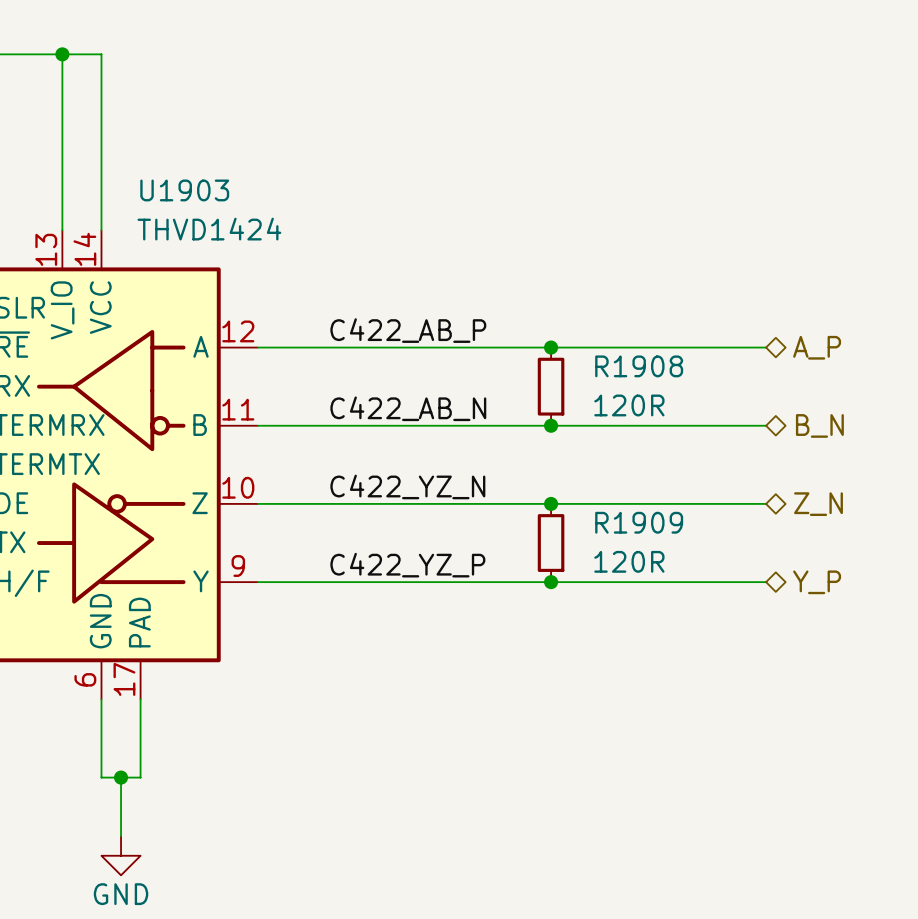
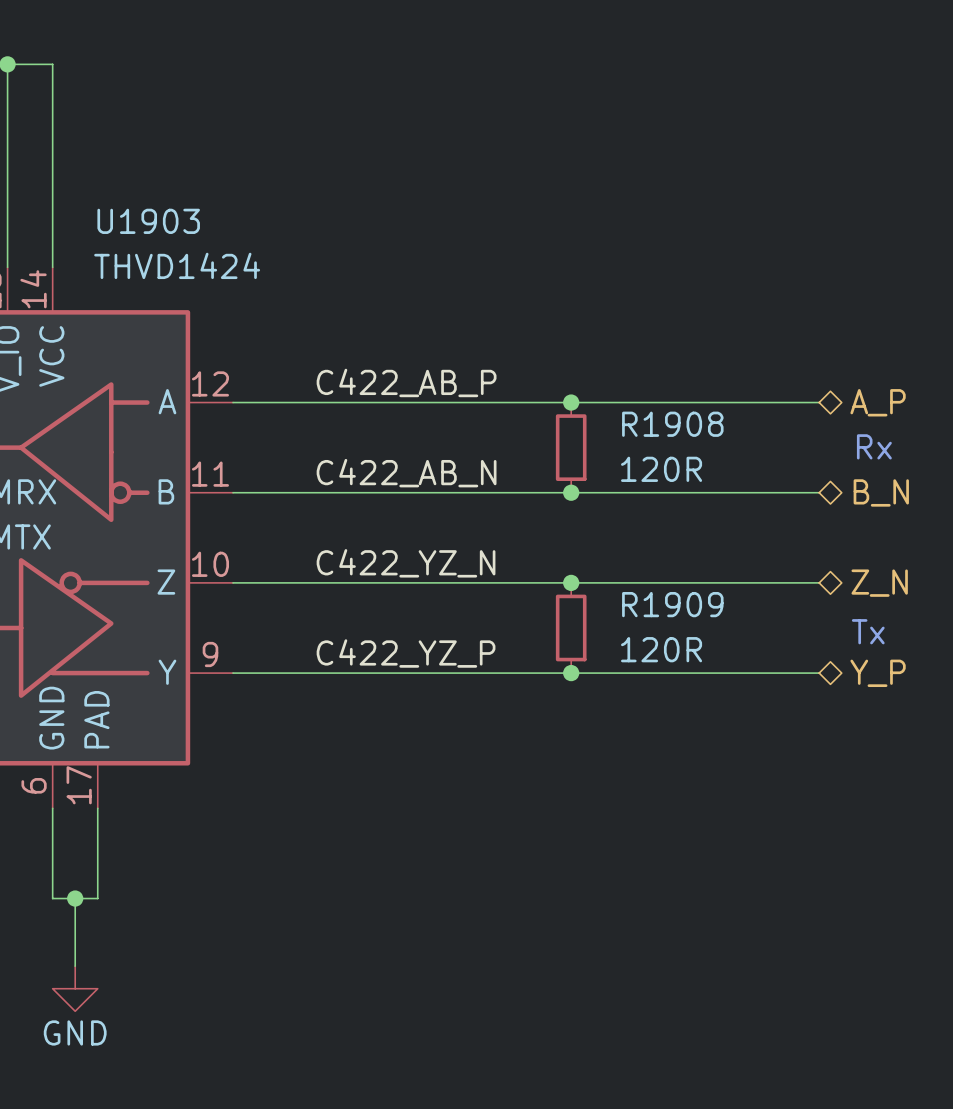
text: none -> Rx (874, 446)
text: none -> Tx (868, 631)

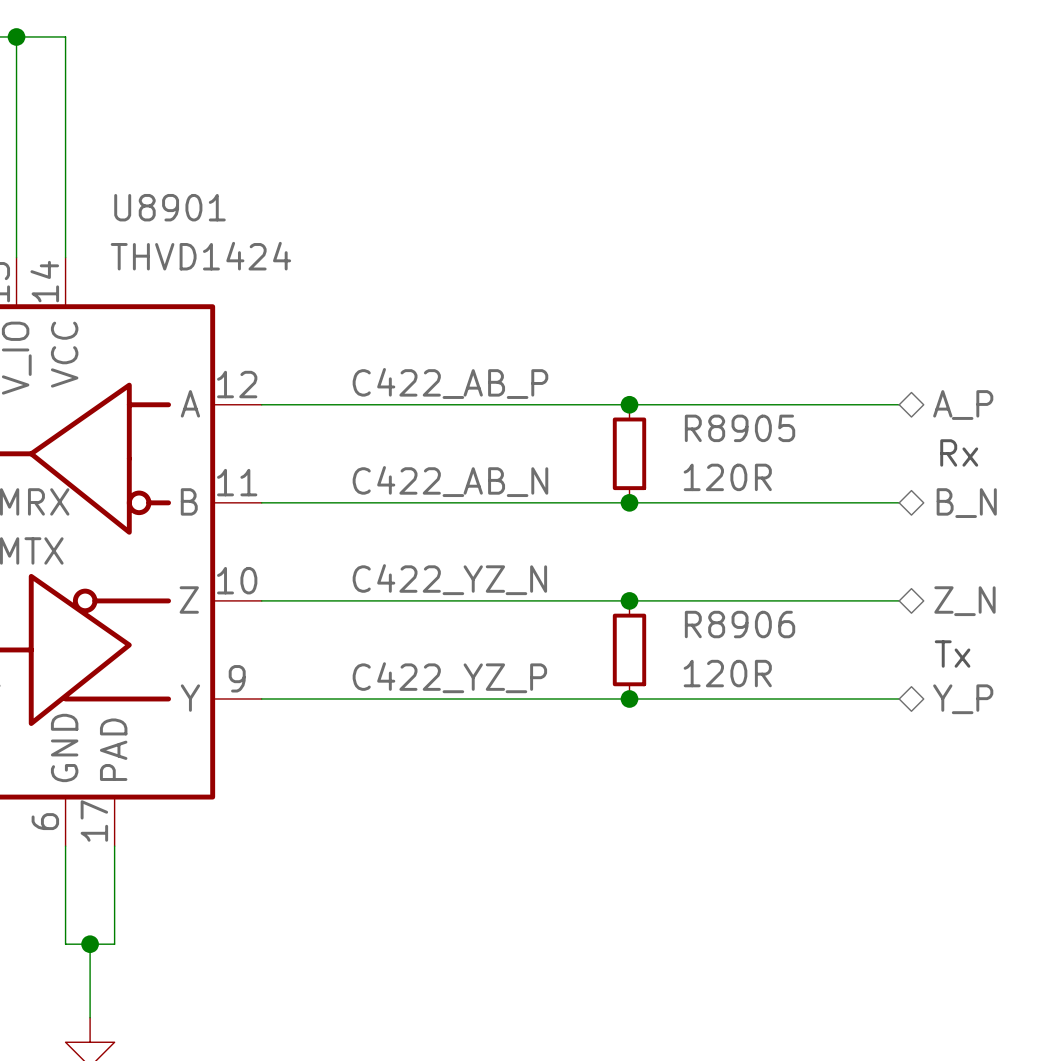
U1903 name: U1903 (148, 221) -> U8901 (169, 207)
R1908 name: R1908 (672, 424) -> R8905 (740, 428)
R1909 name: R1909 (672, 604) -> R8906 (740, 624)

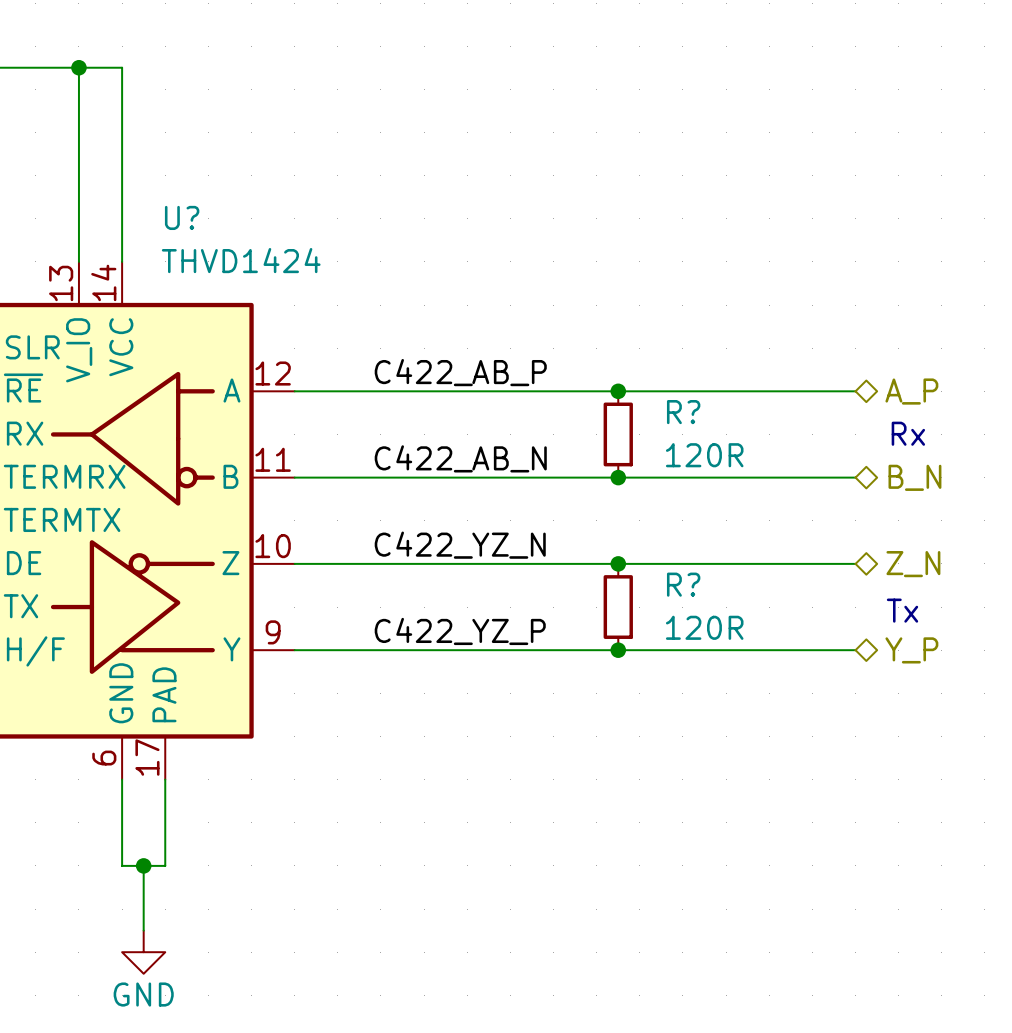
U8901 name: U8901 (169, 207) -> U? (182, 217)
R8905 name: R8905 (740, 428) -> R? (683, 412)
R8906 name: R8906 (740, 624) -> R? (683, 584)

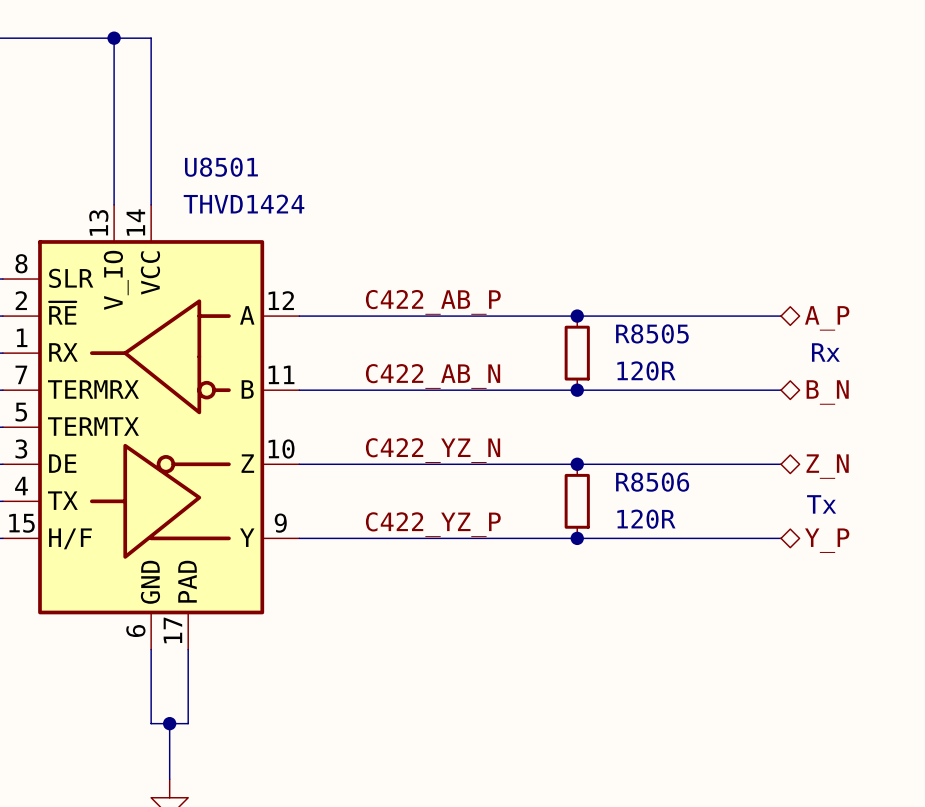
U? name: U? (182, 217) -> U8501 (221, 167)
R? name: R? (683, 412) -> R8505 (652, 333)
R? name: R? (683, 584) -> R8506 (652, 482)

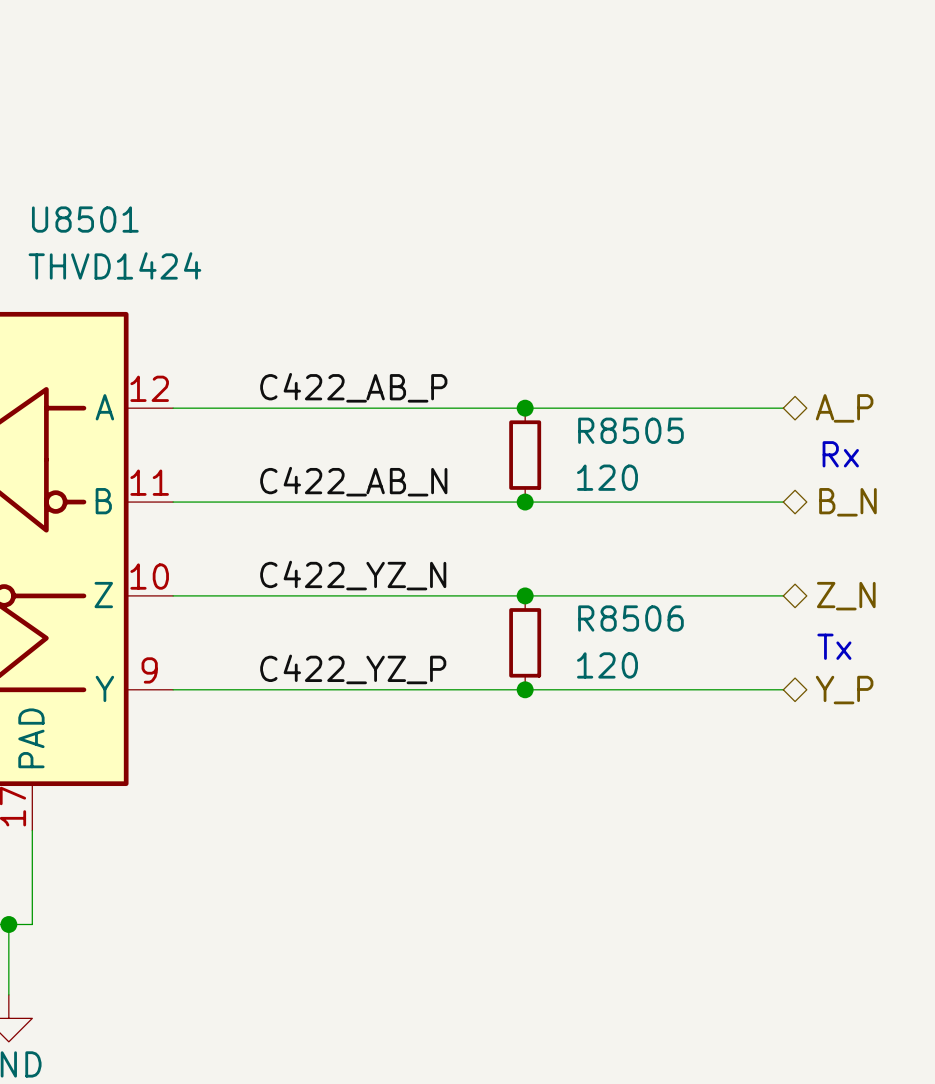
R8505 value: 120R (646, 370) -> 120 (607, 477)
R8506 value: 120R (646, 519) -> 120 (607, 665)

